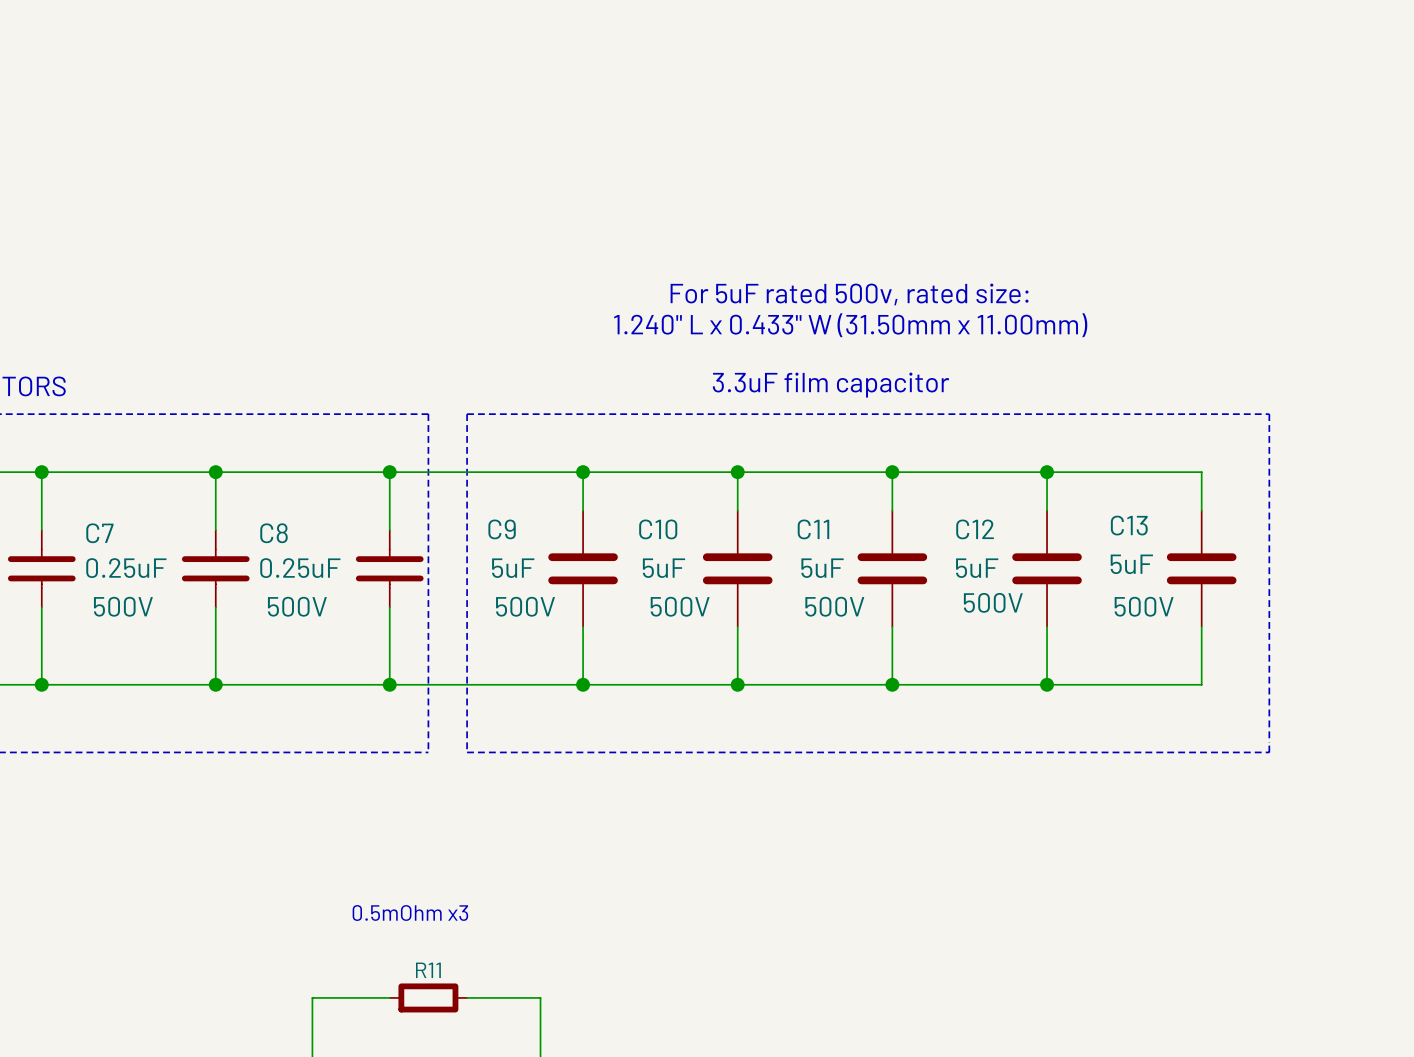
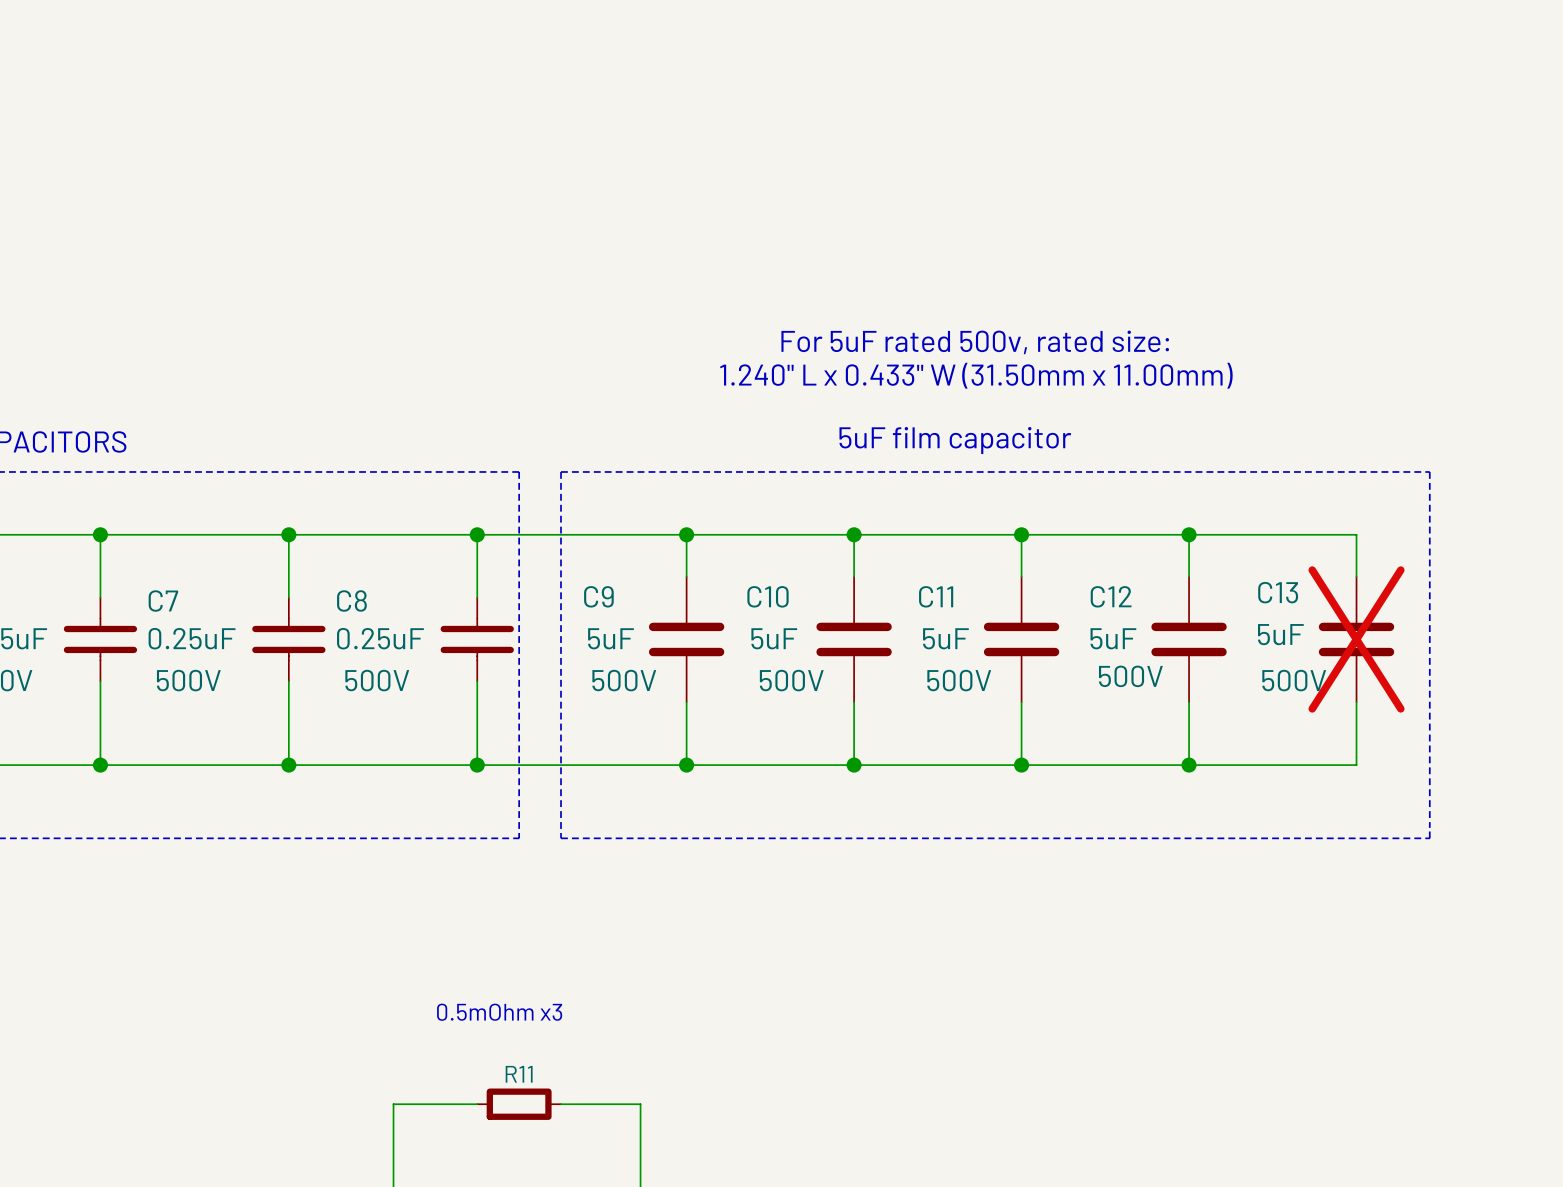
text: 3.3uF film capacitor (830, 385) -> 5uF film capacitor (955, 440)
C13 do-not-place cross: none -> (1356, 639)

